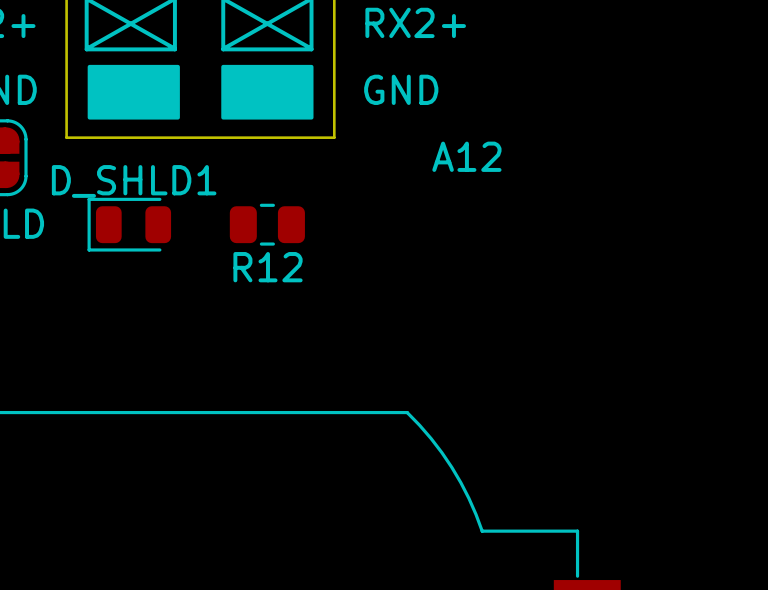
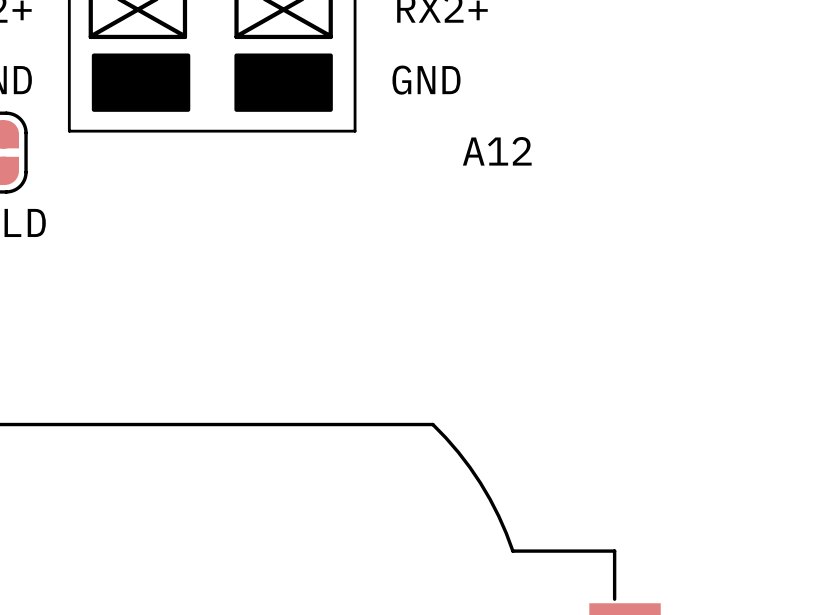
D_SHLD1: (129, 224) -> none
R12: (267, 224) -> none

